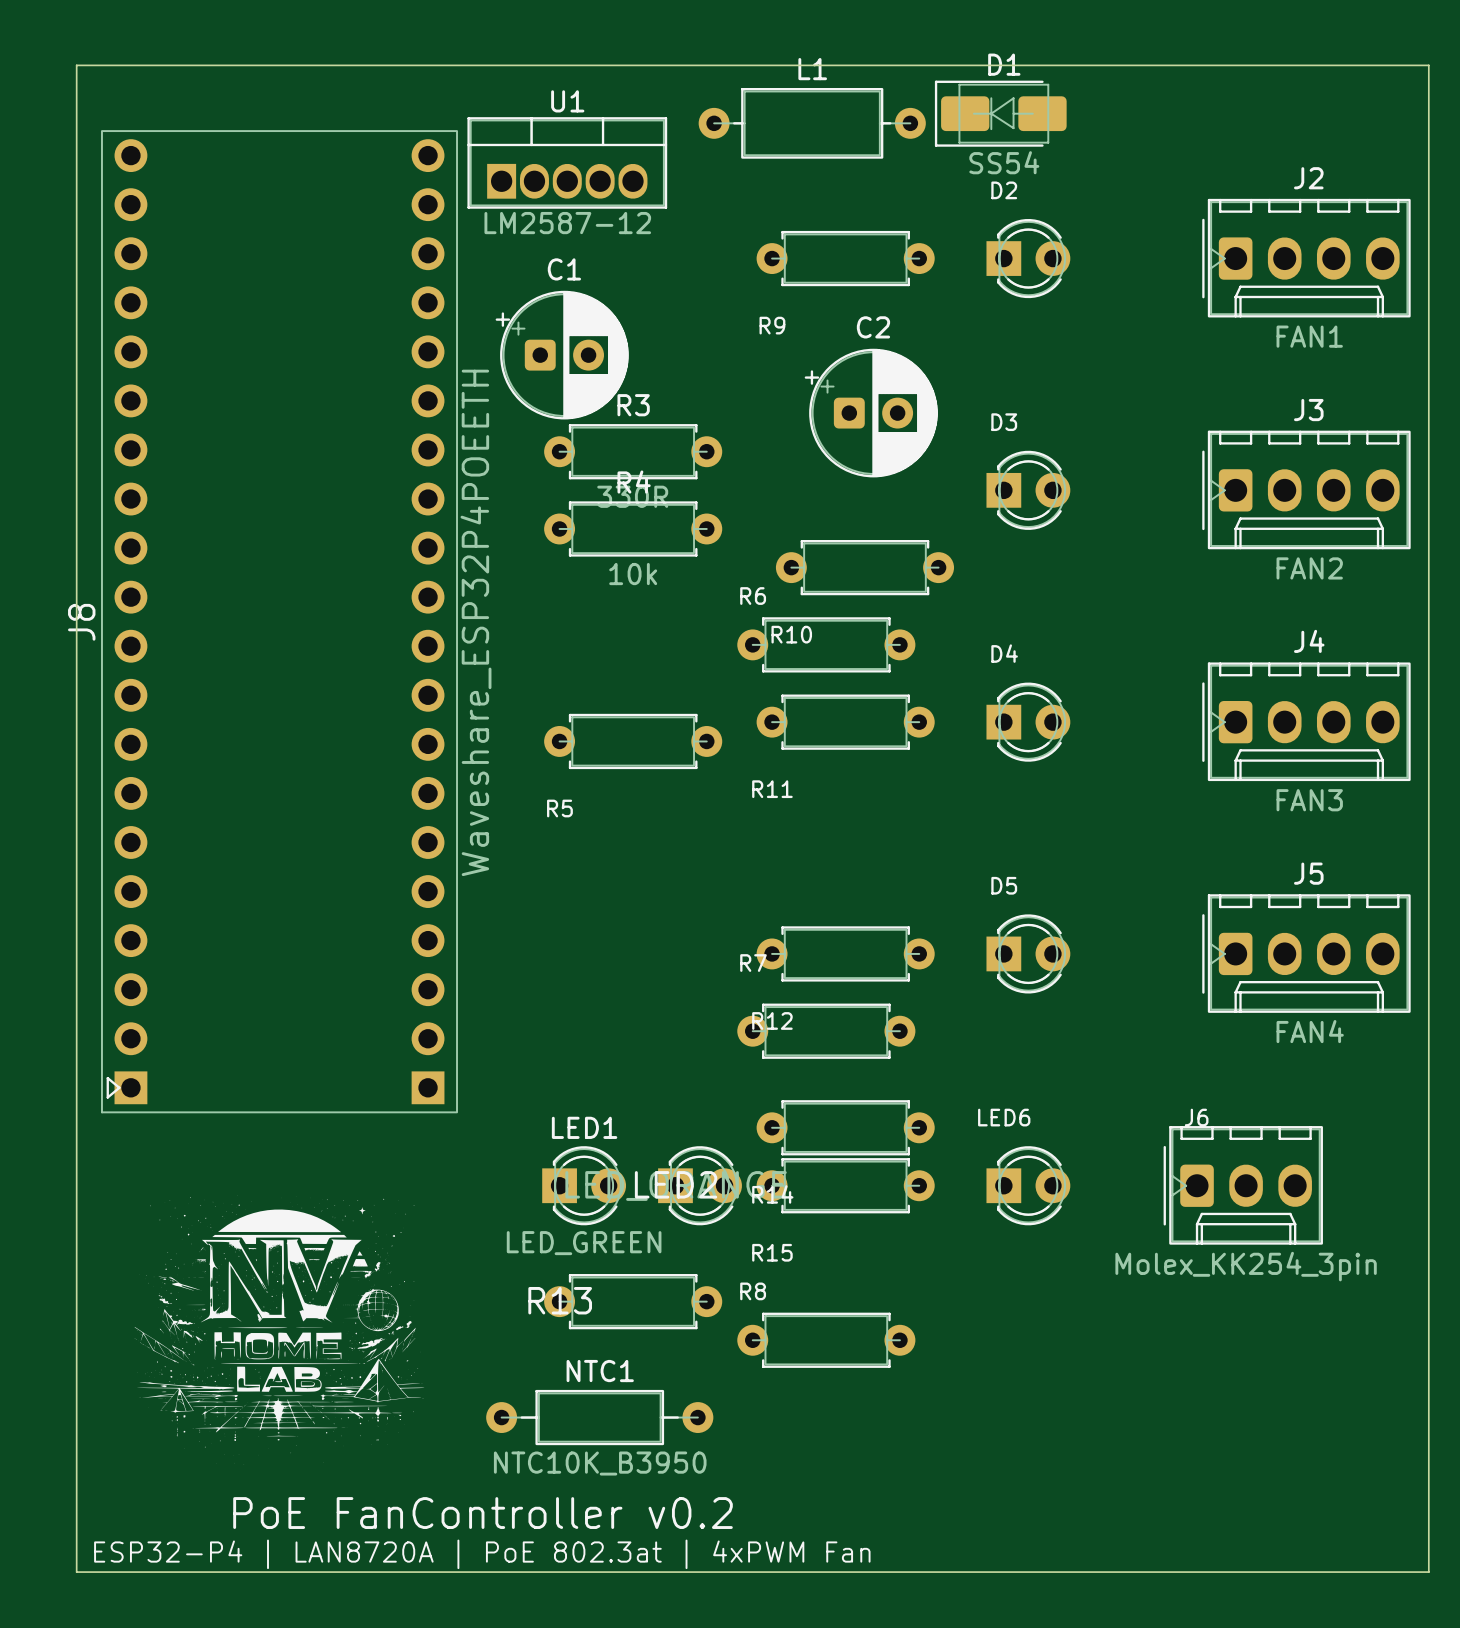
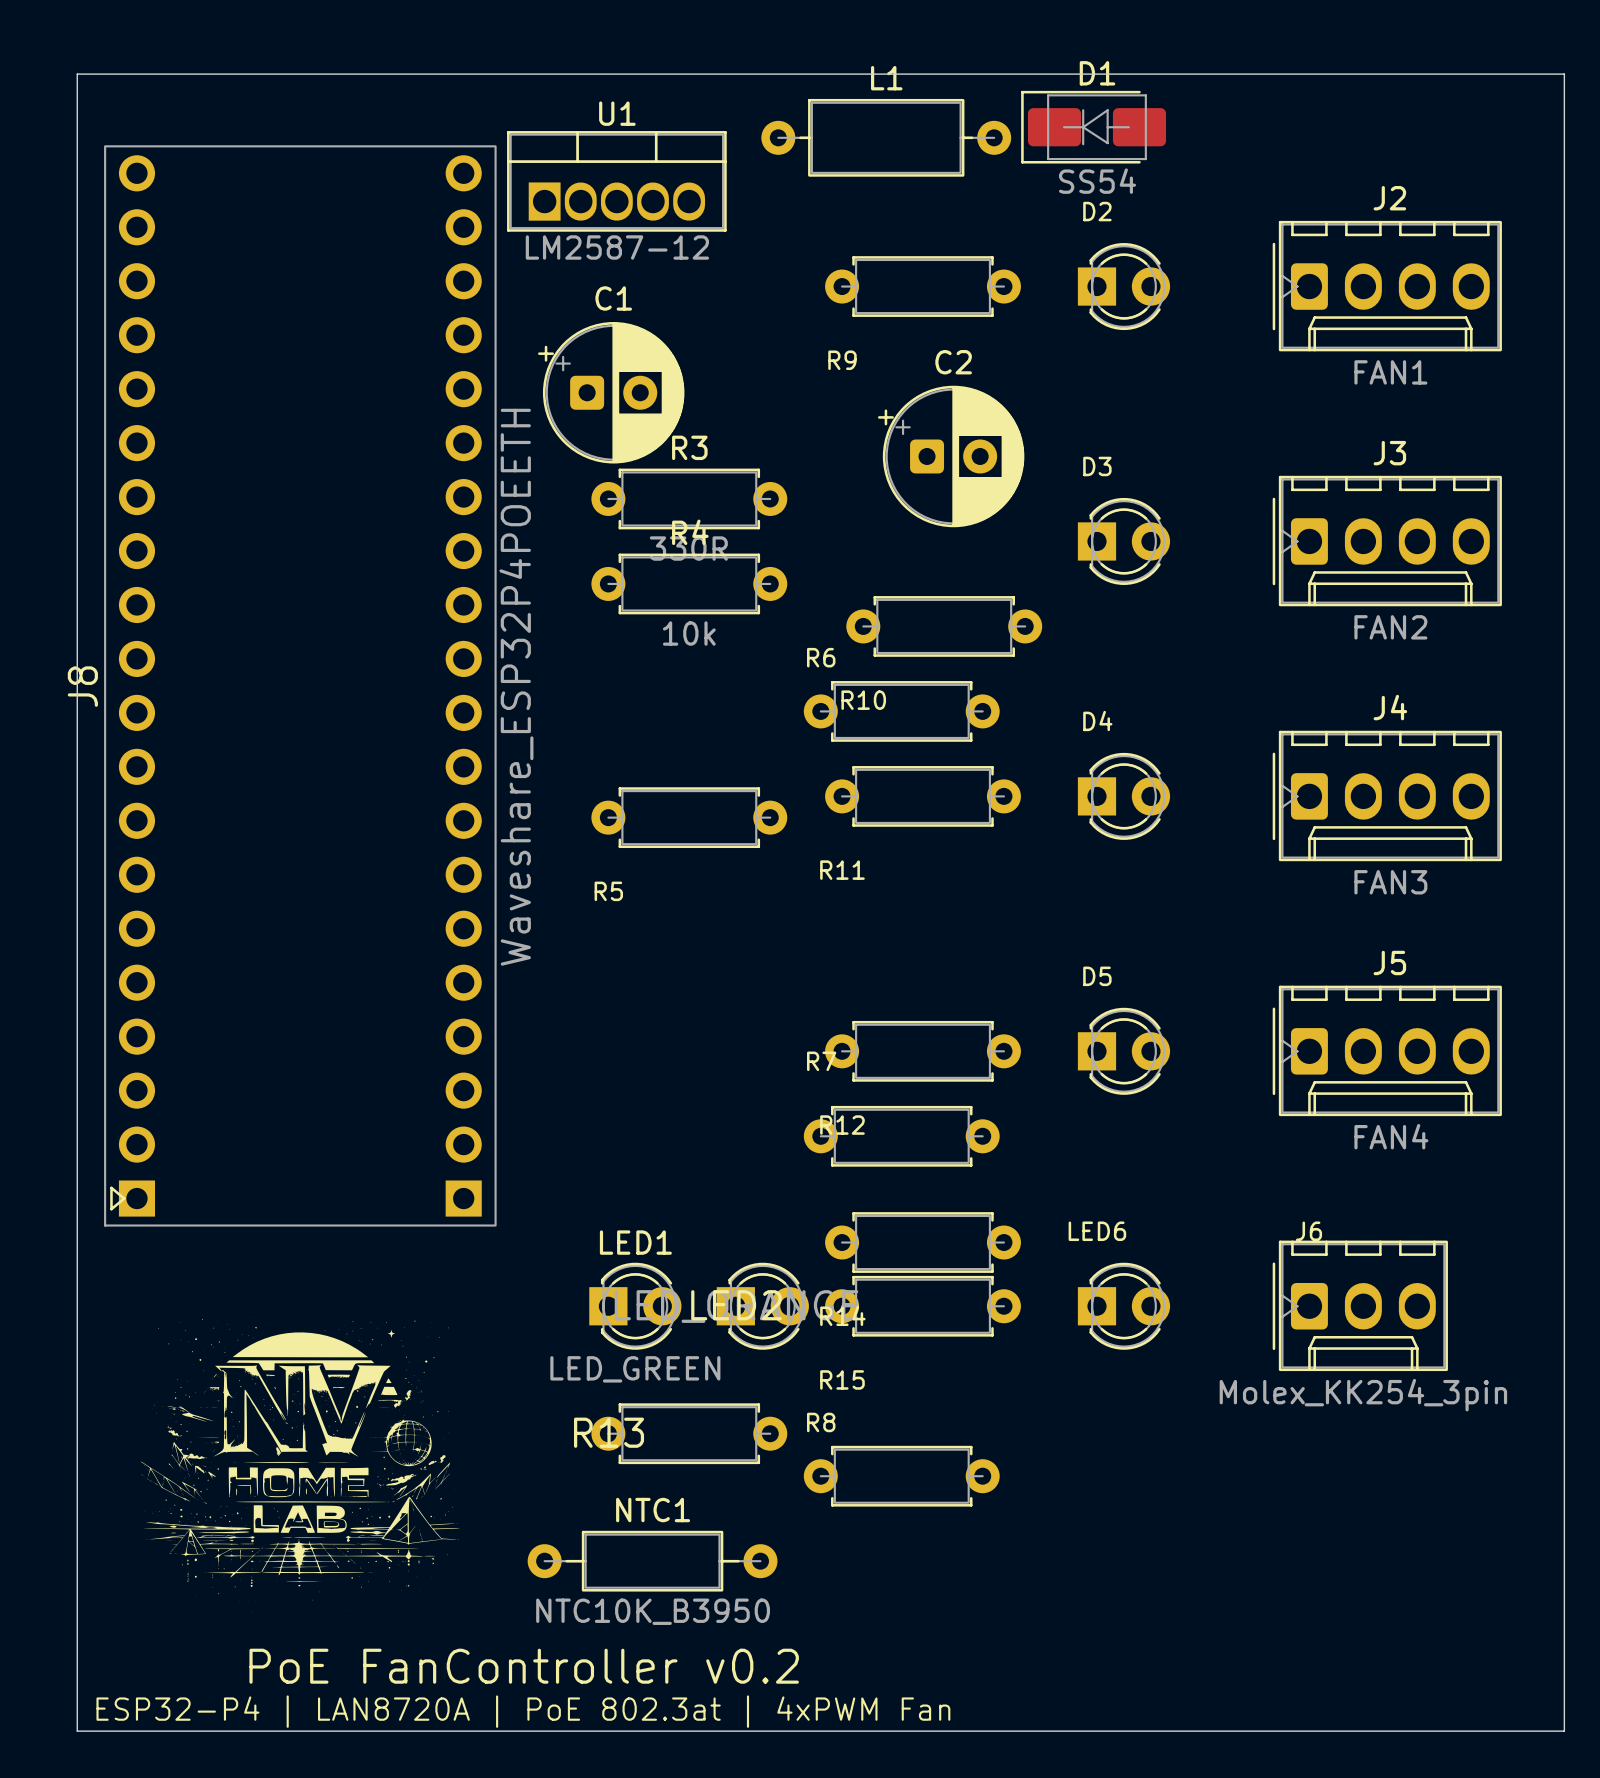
J2 position: (1306, 258) -> (1387, 286)
J3 position: (1306, 489) -> (1387, 541)
J4 position: (1306, 721) -> (1387, 795)
J5 position: (1306, 953) -> (1387, 1050)

